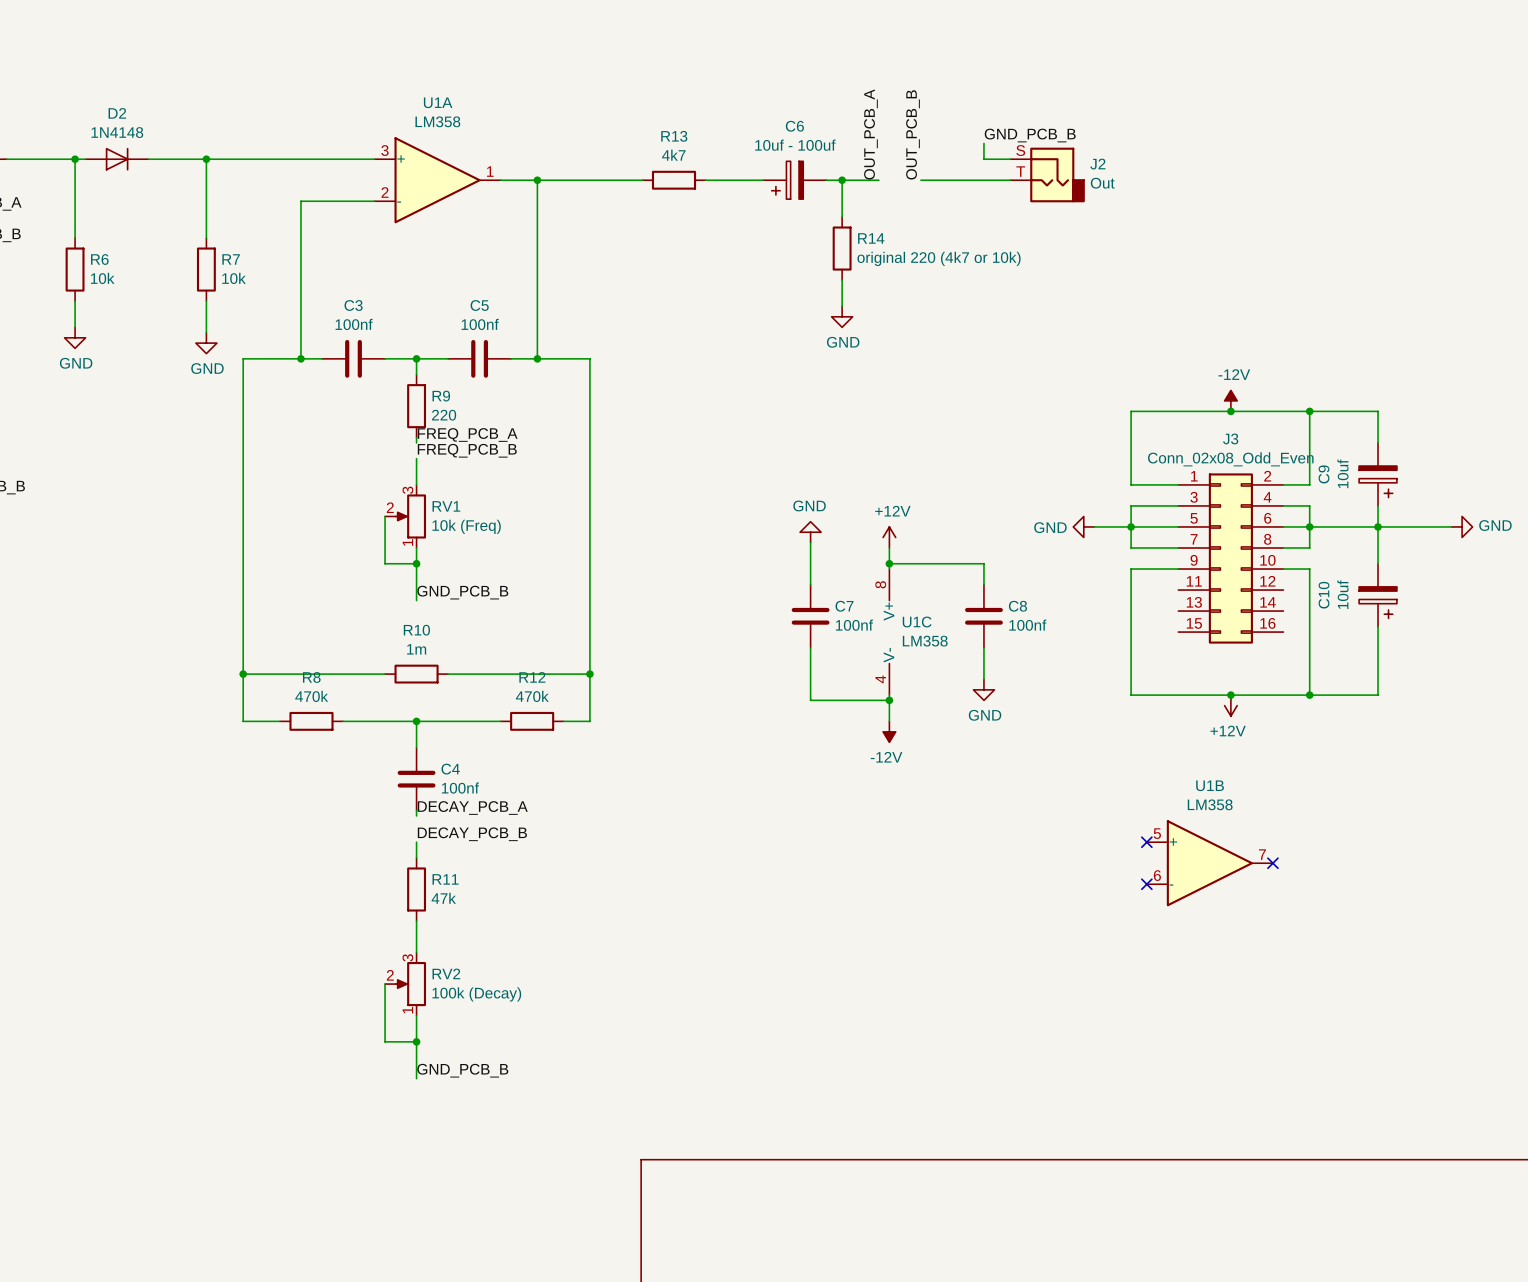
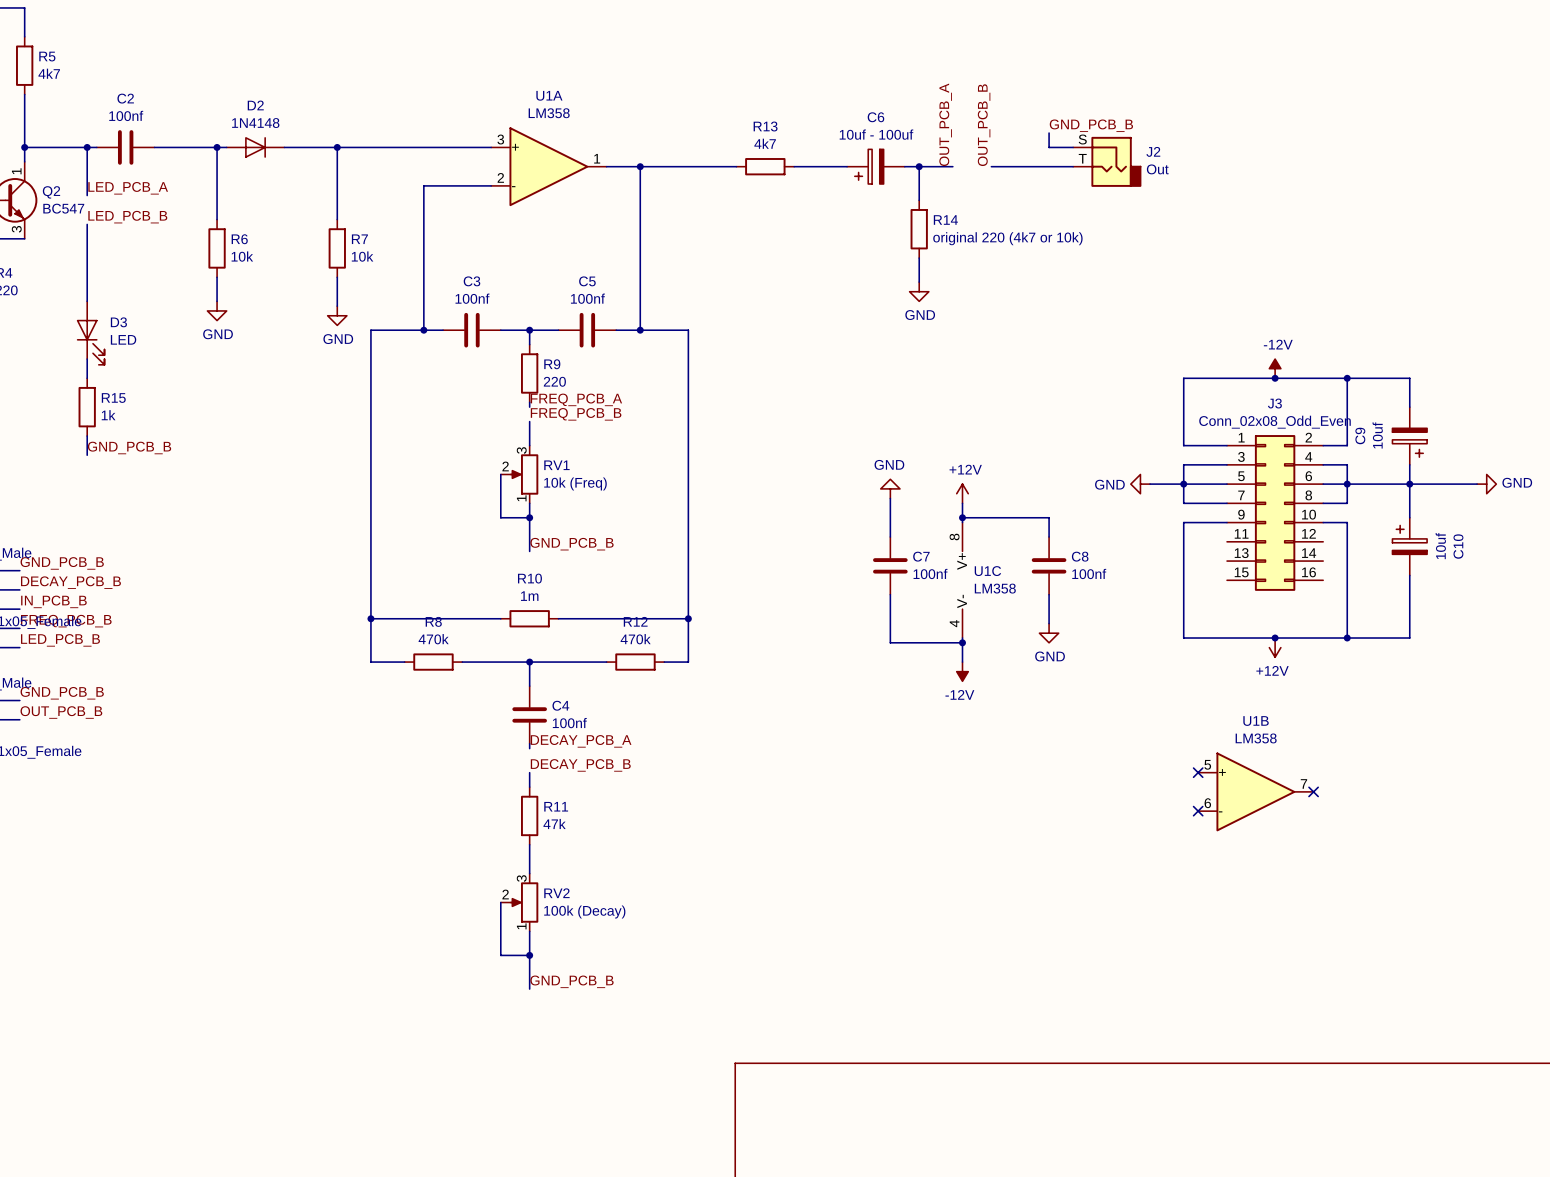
C10 rotation: 0° (1378, 602) -> 180° (1409, 539)

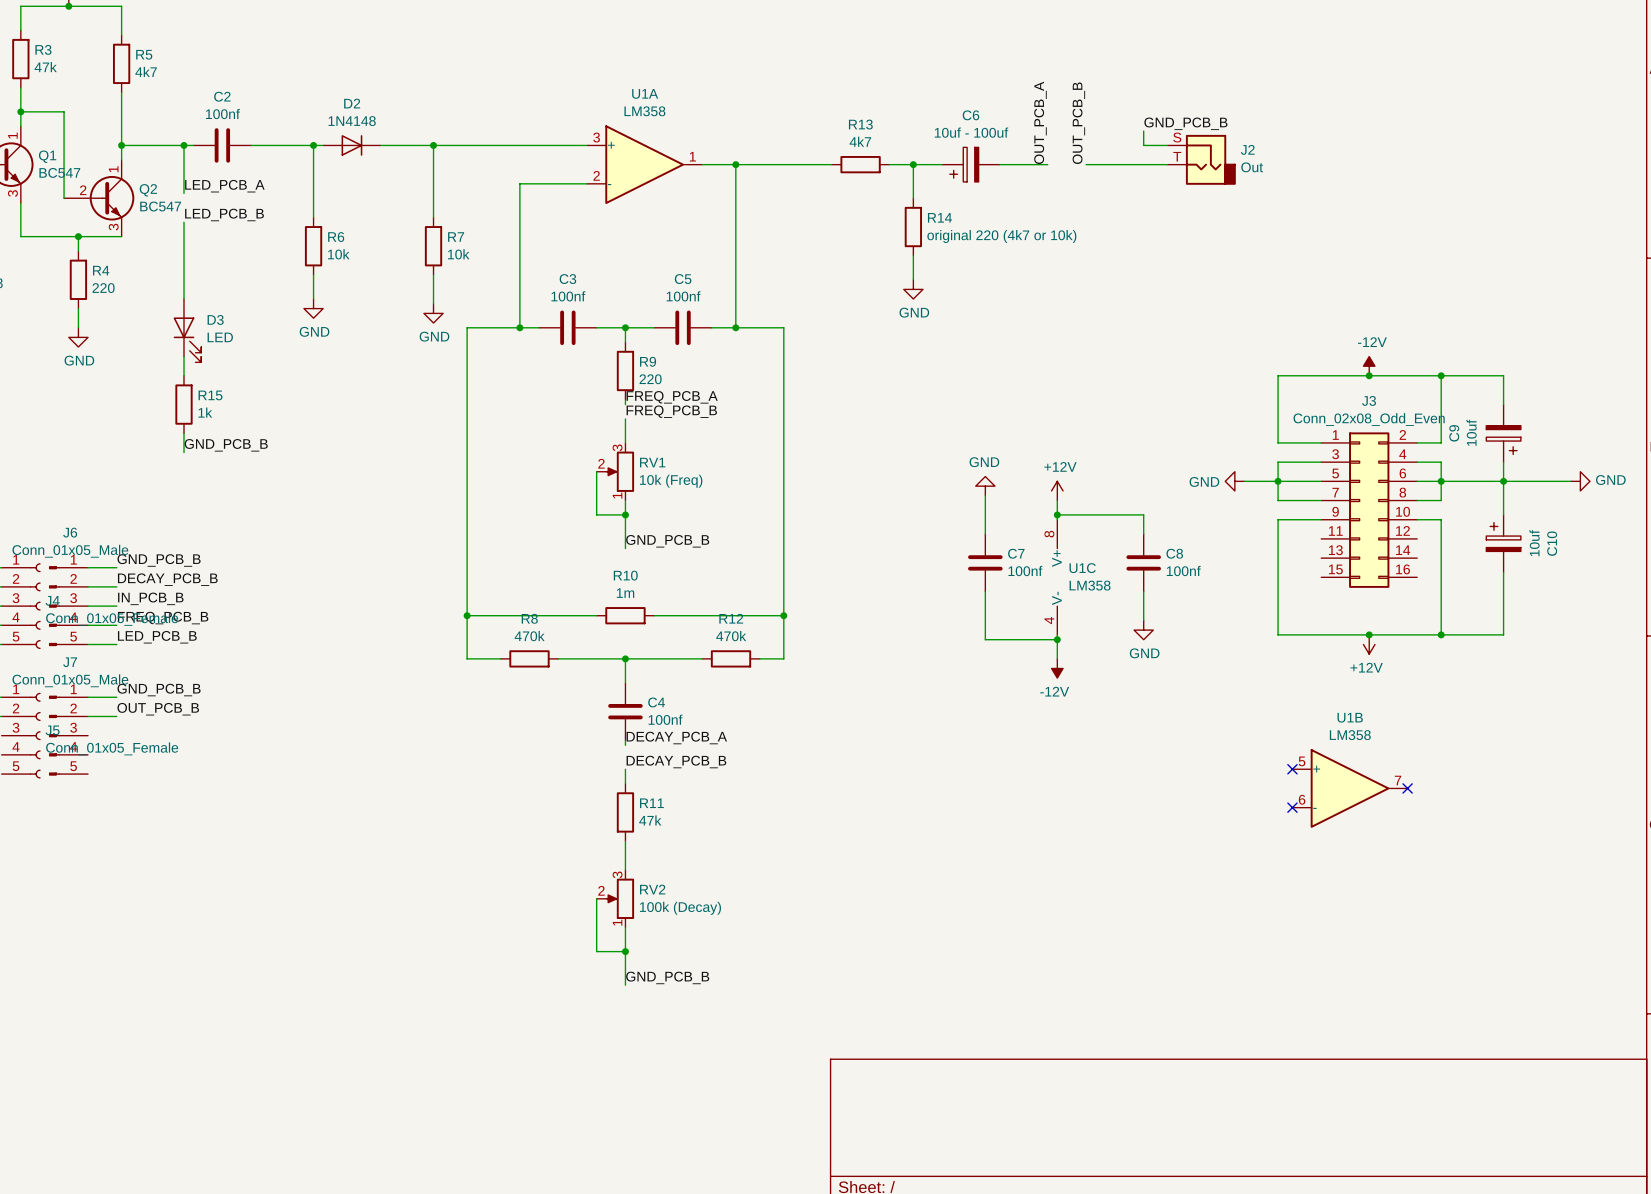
junction: none -> (913, 164)
wire: (919, 166) (919, 200) -> (913, 164) (913, 198)
junction: (919, 166) -> none
R14 position: (919, 229) -> (913, 227)
wire: (919, 258) (919, 282) -> (913, 255) (913, 279)
power symbol position: GND (919, 291) -> GND (913, 289)

